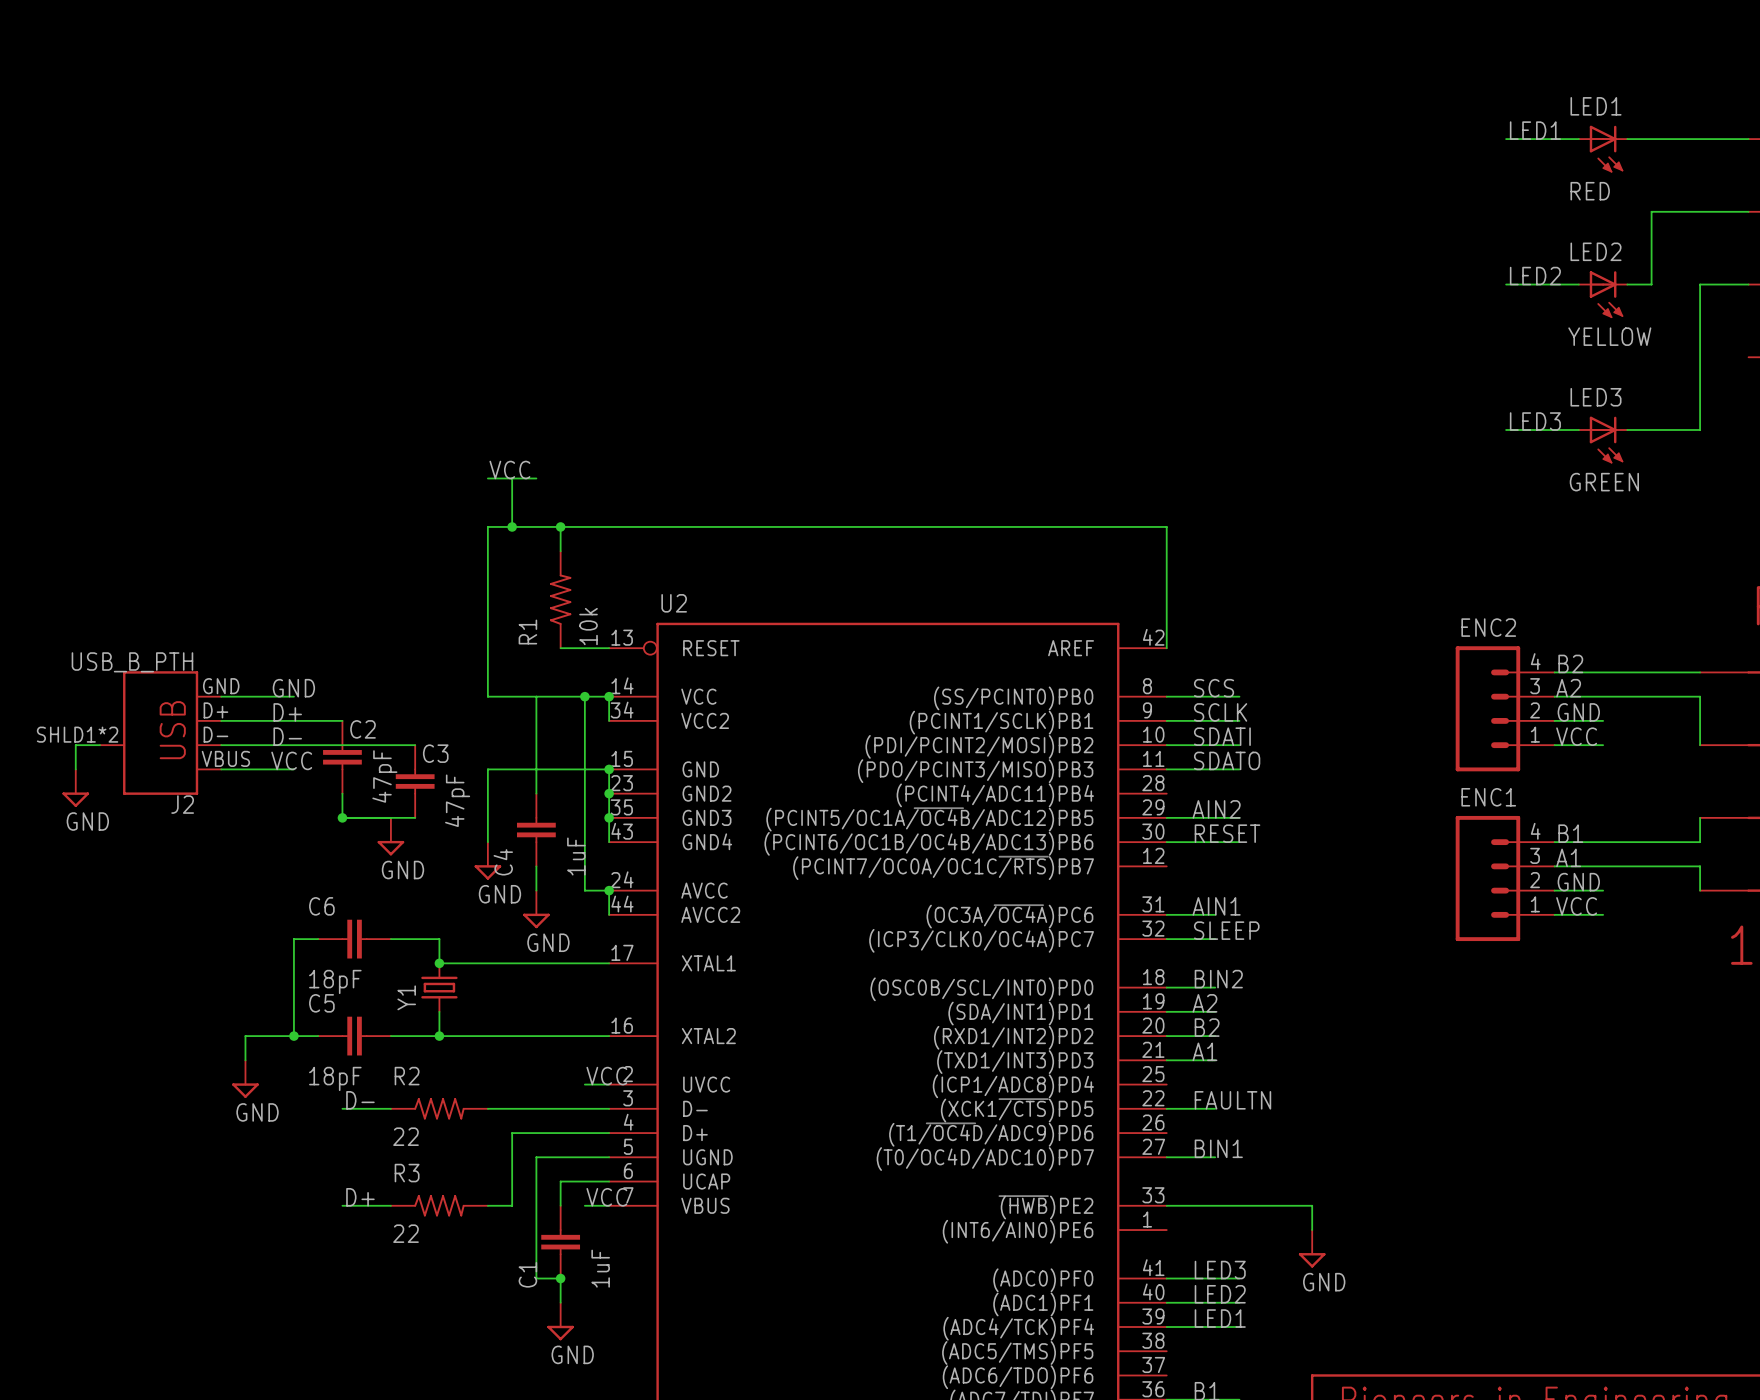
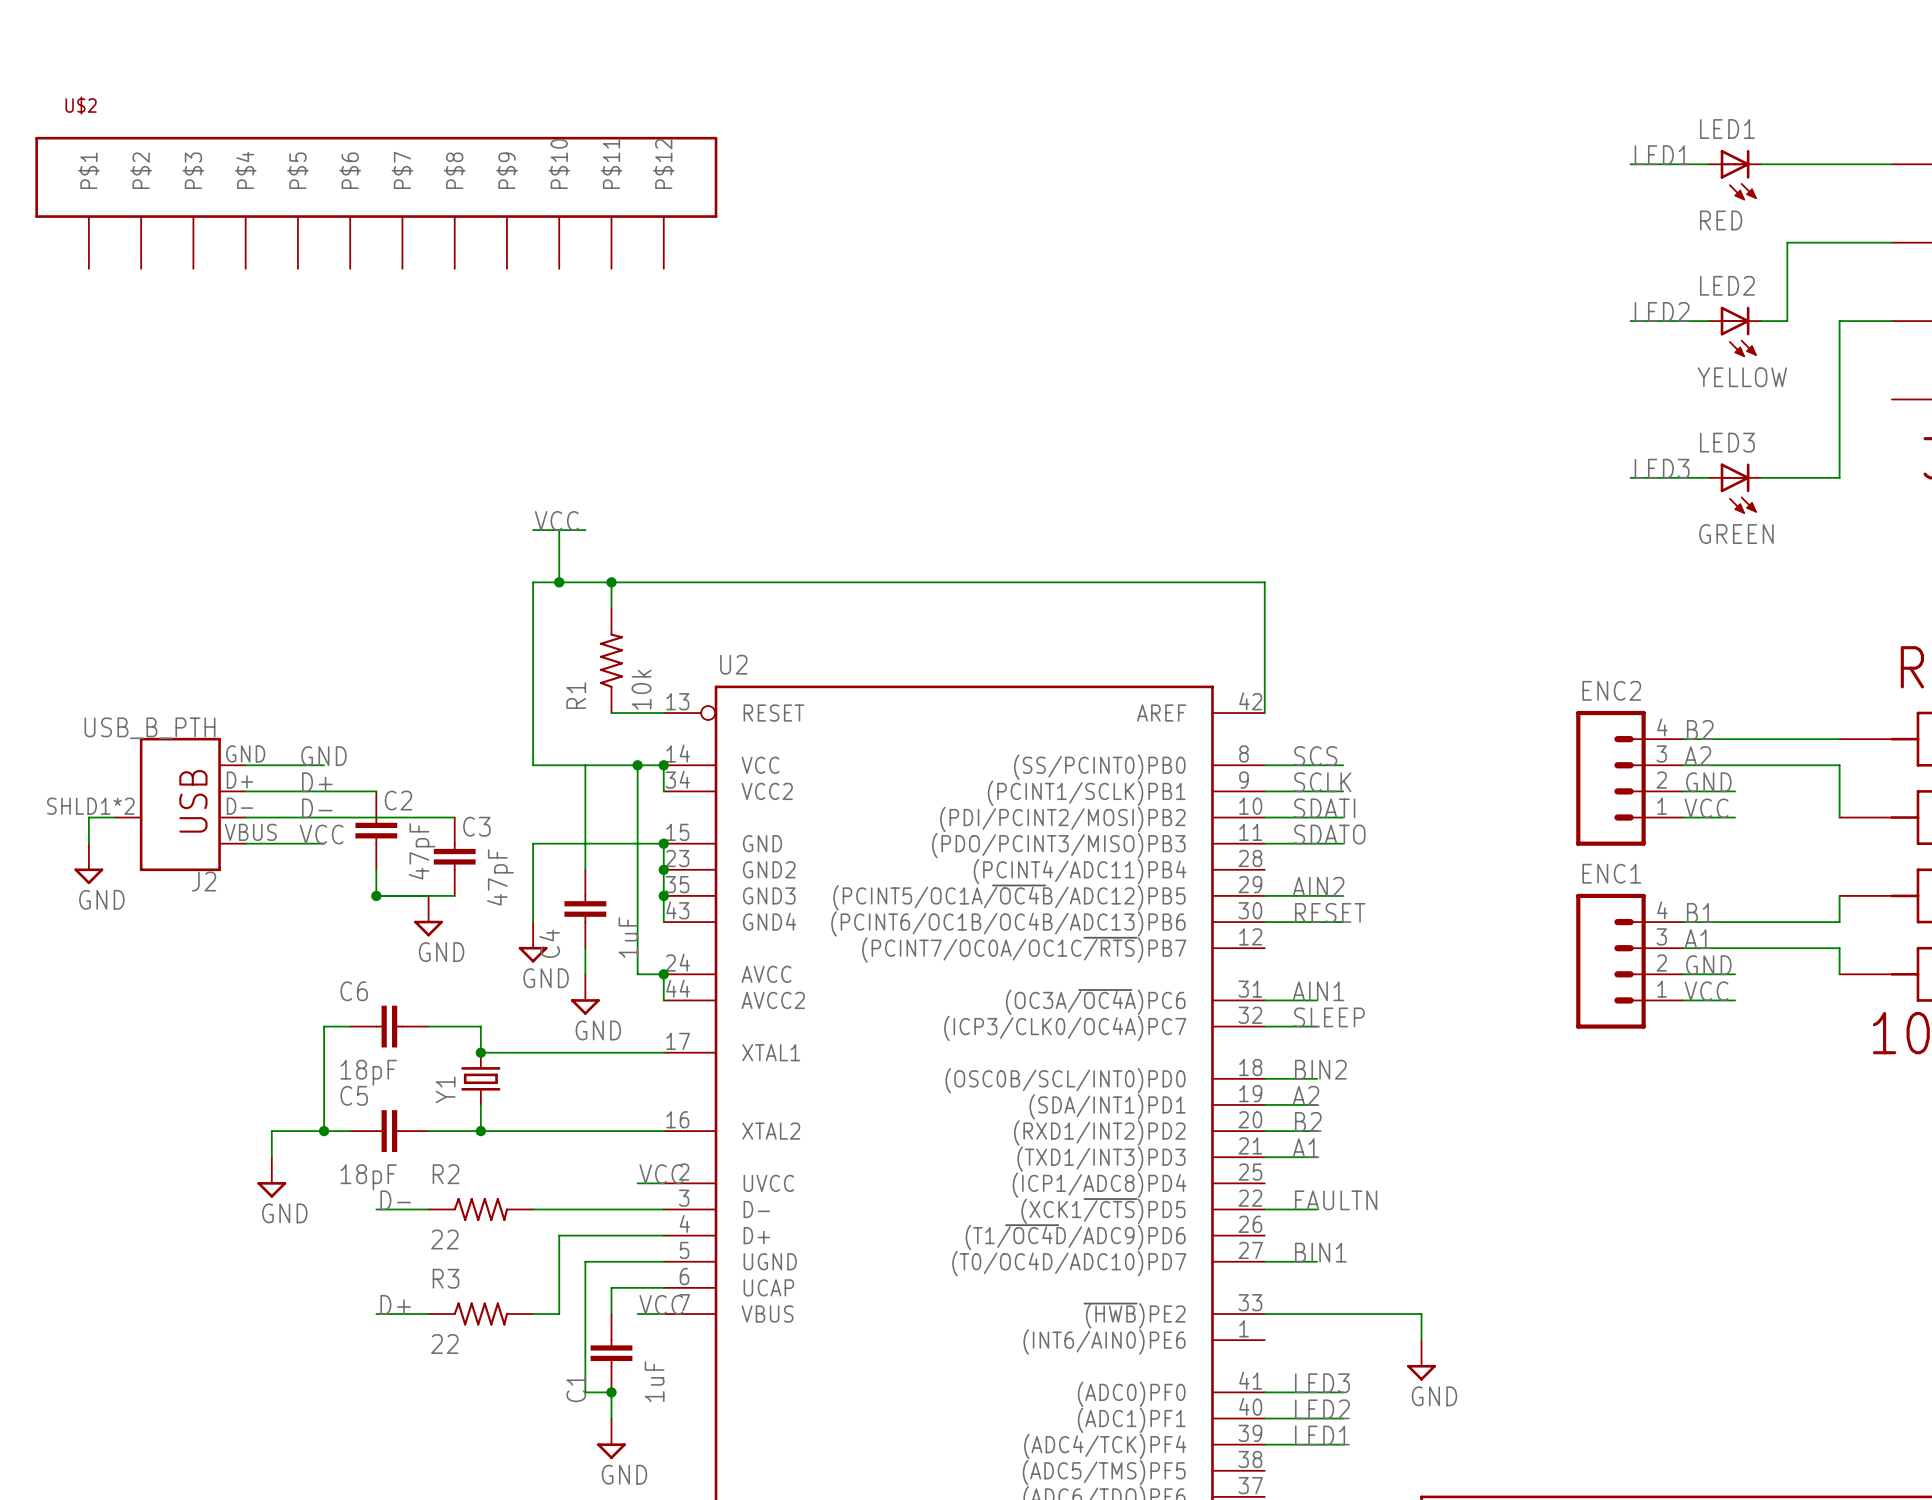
U$2: none -> (376, 202)

